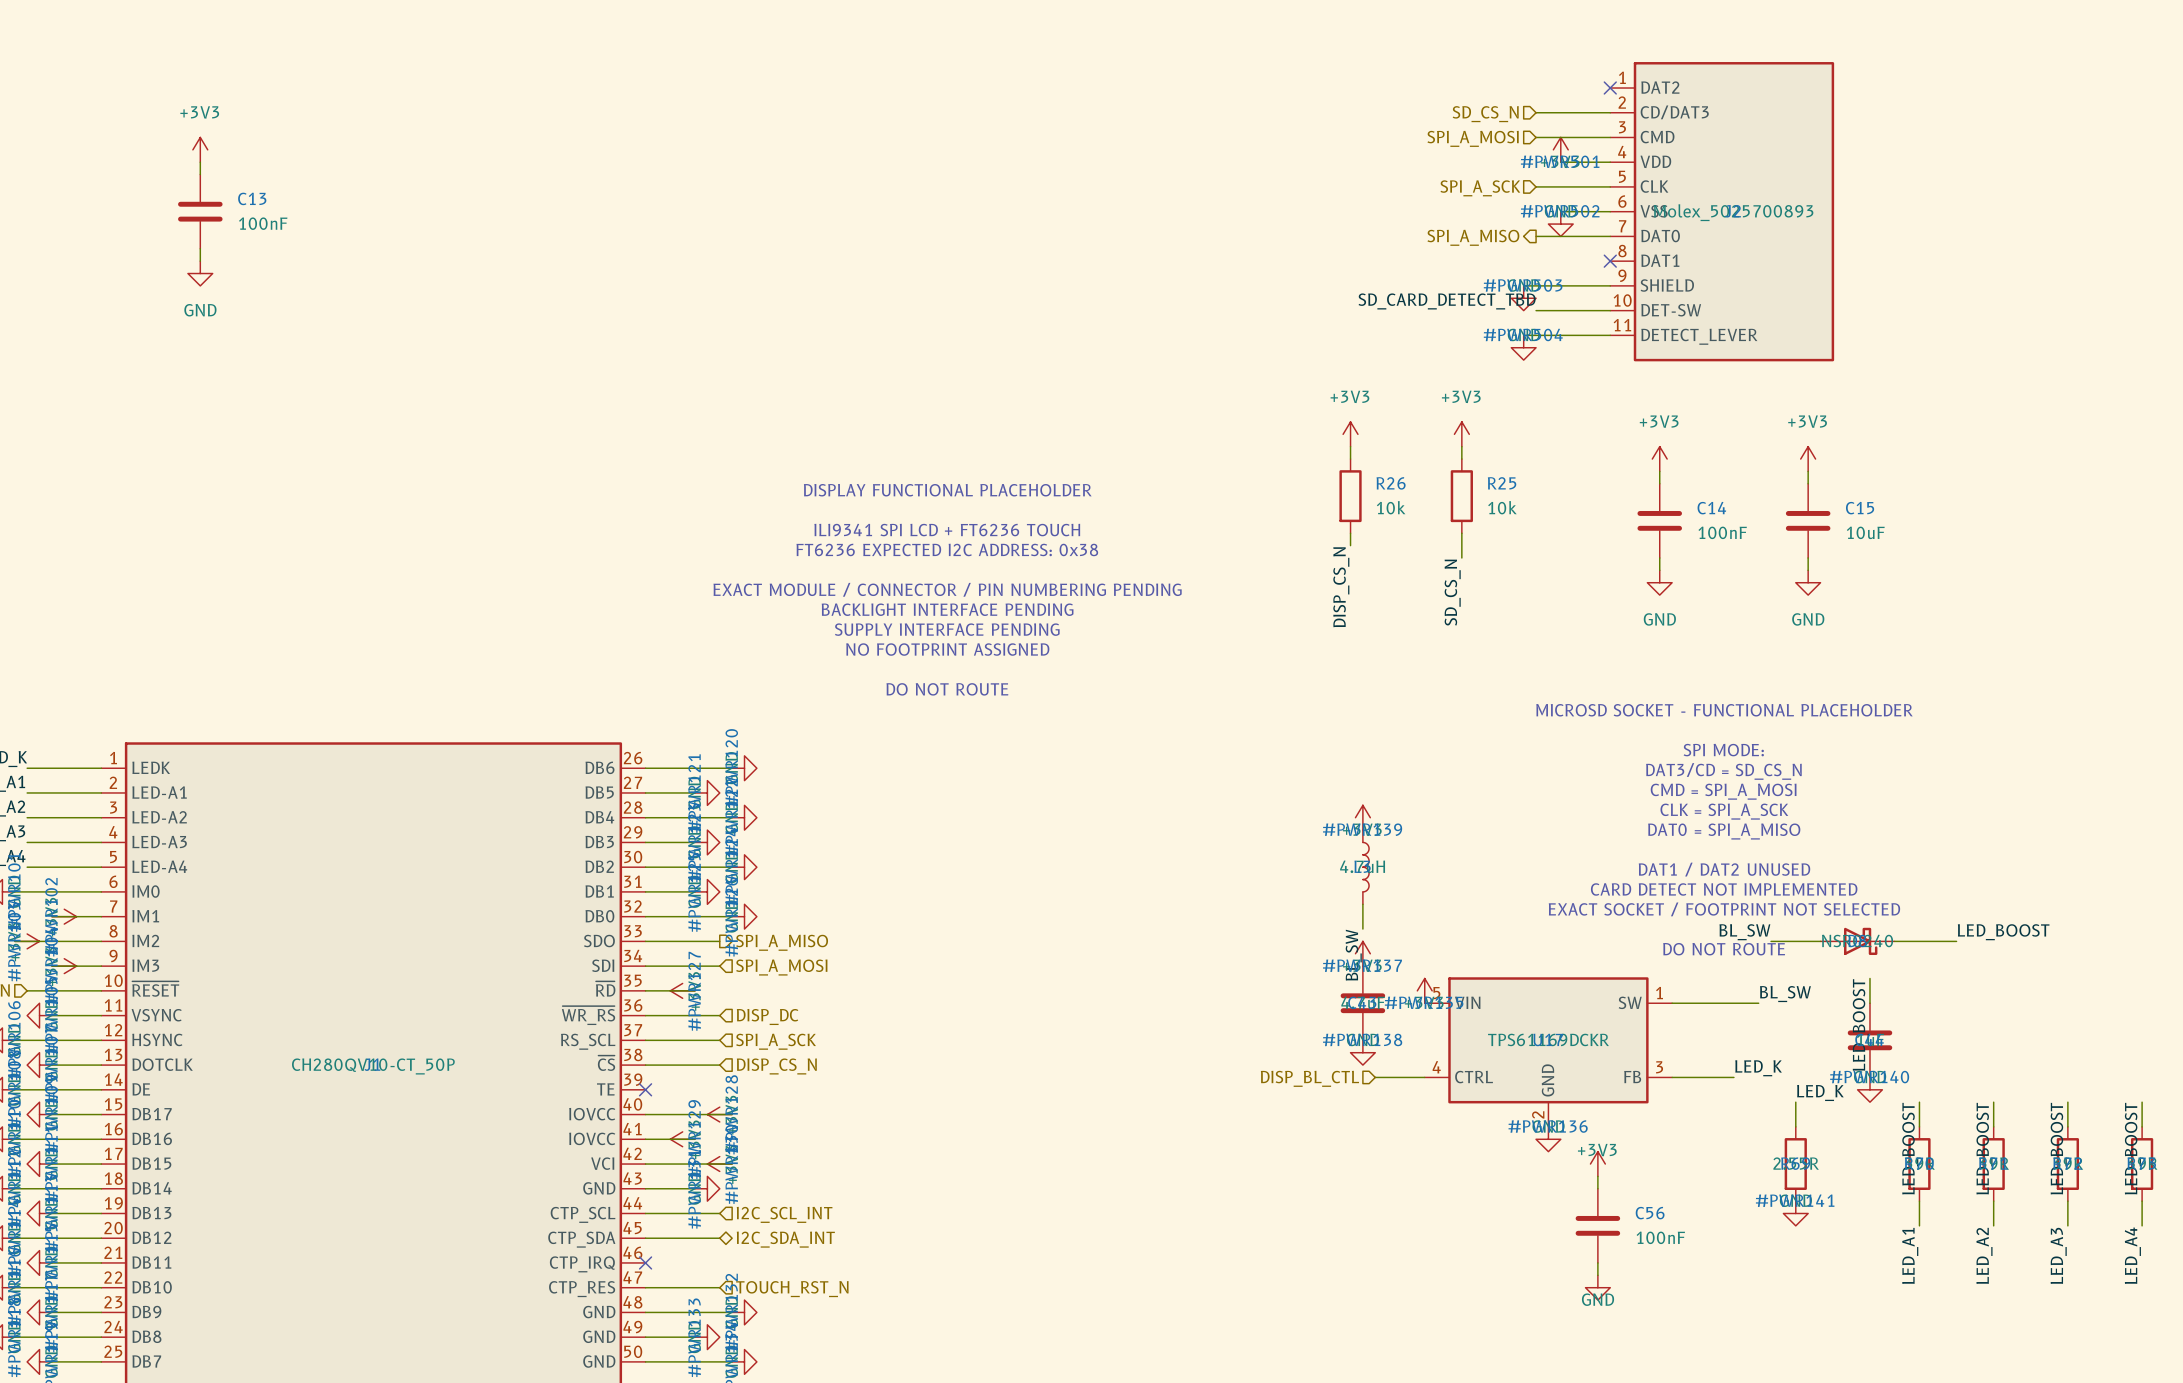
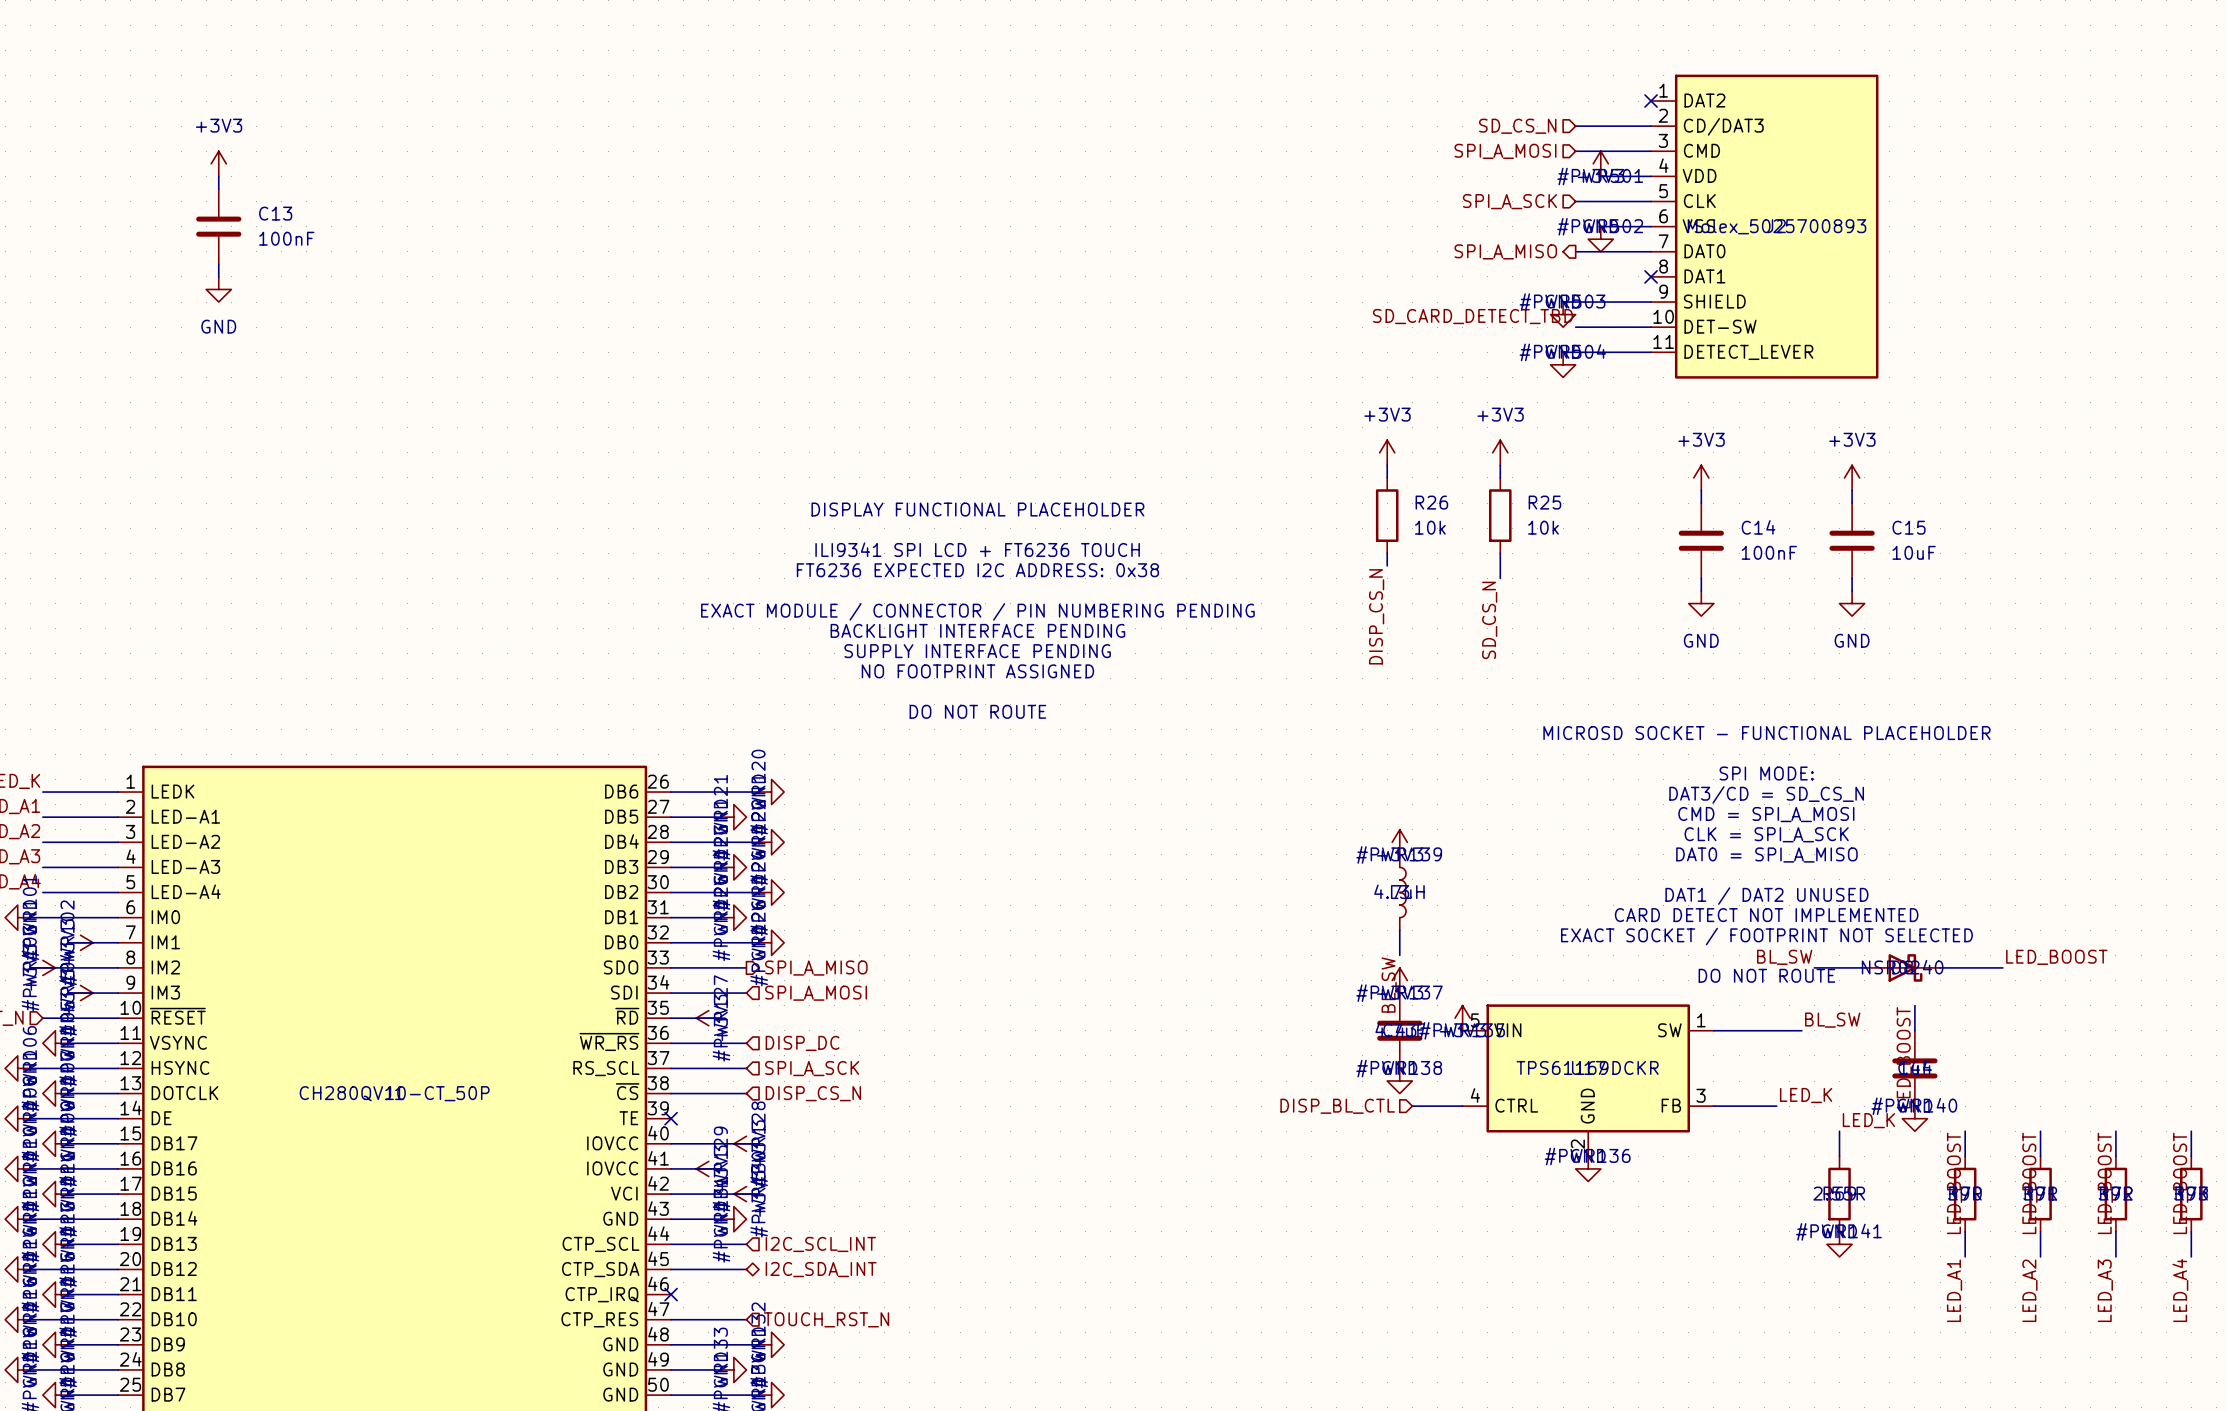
power symbol: +3V3 (1597, 1164) -> none
wire: (1597, 1176) (1597, 1188) -> none
C56: 100nF (1597, 1225) -> none
wire: (1597, 1262) (1597, 1275) -> none
power symbol: GND (1597, 1287) -> none

